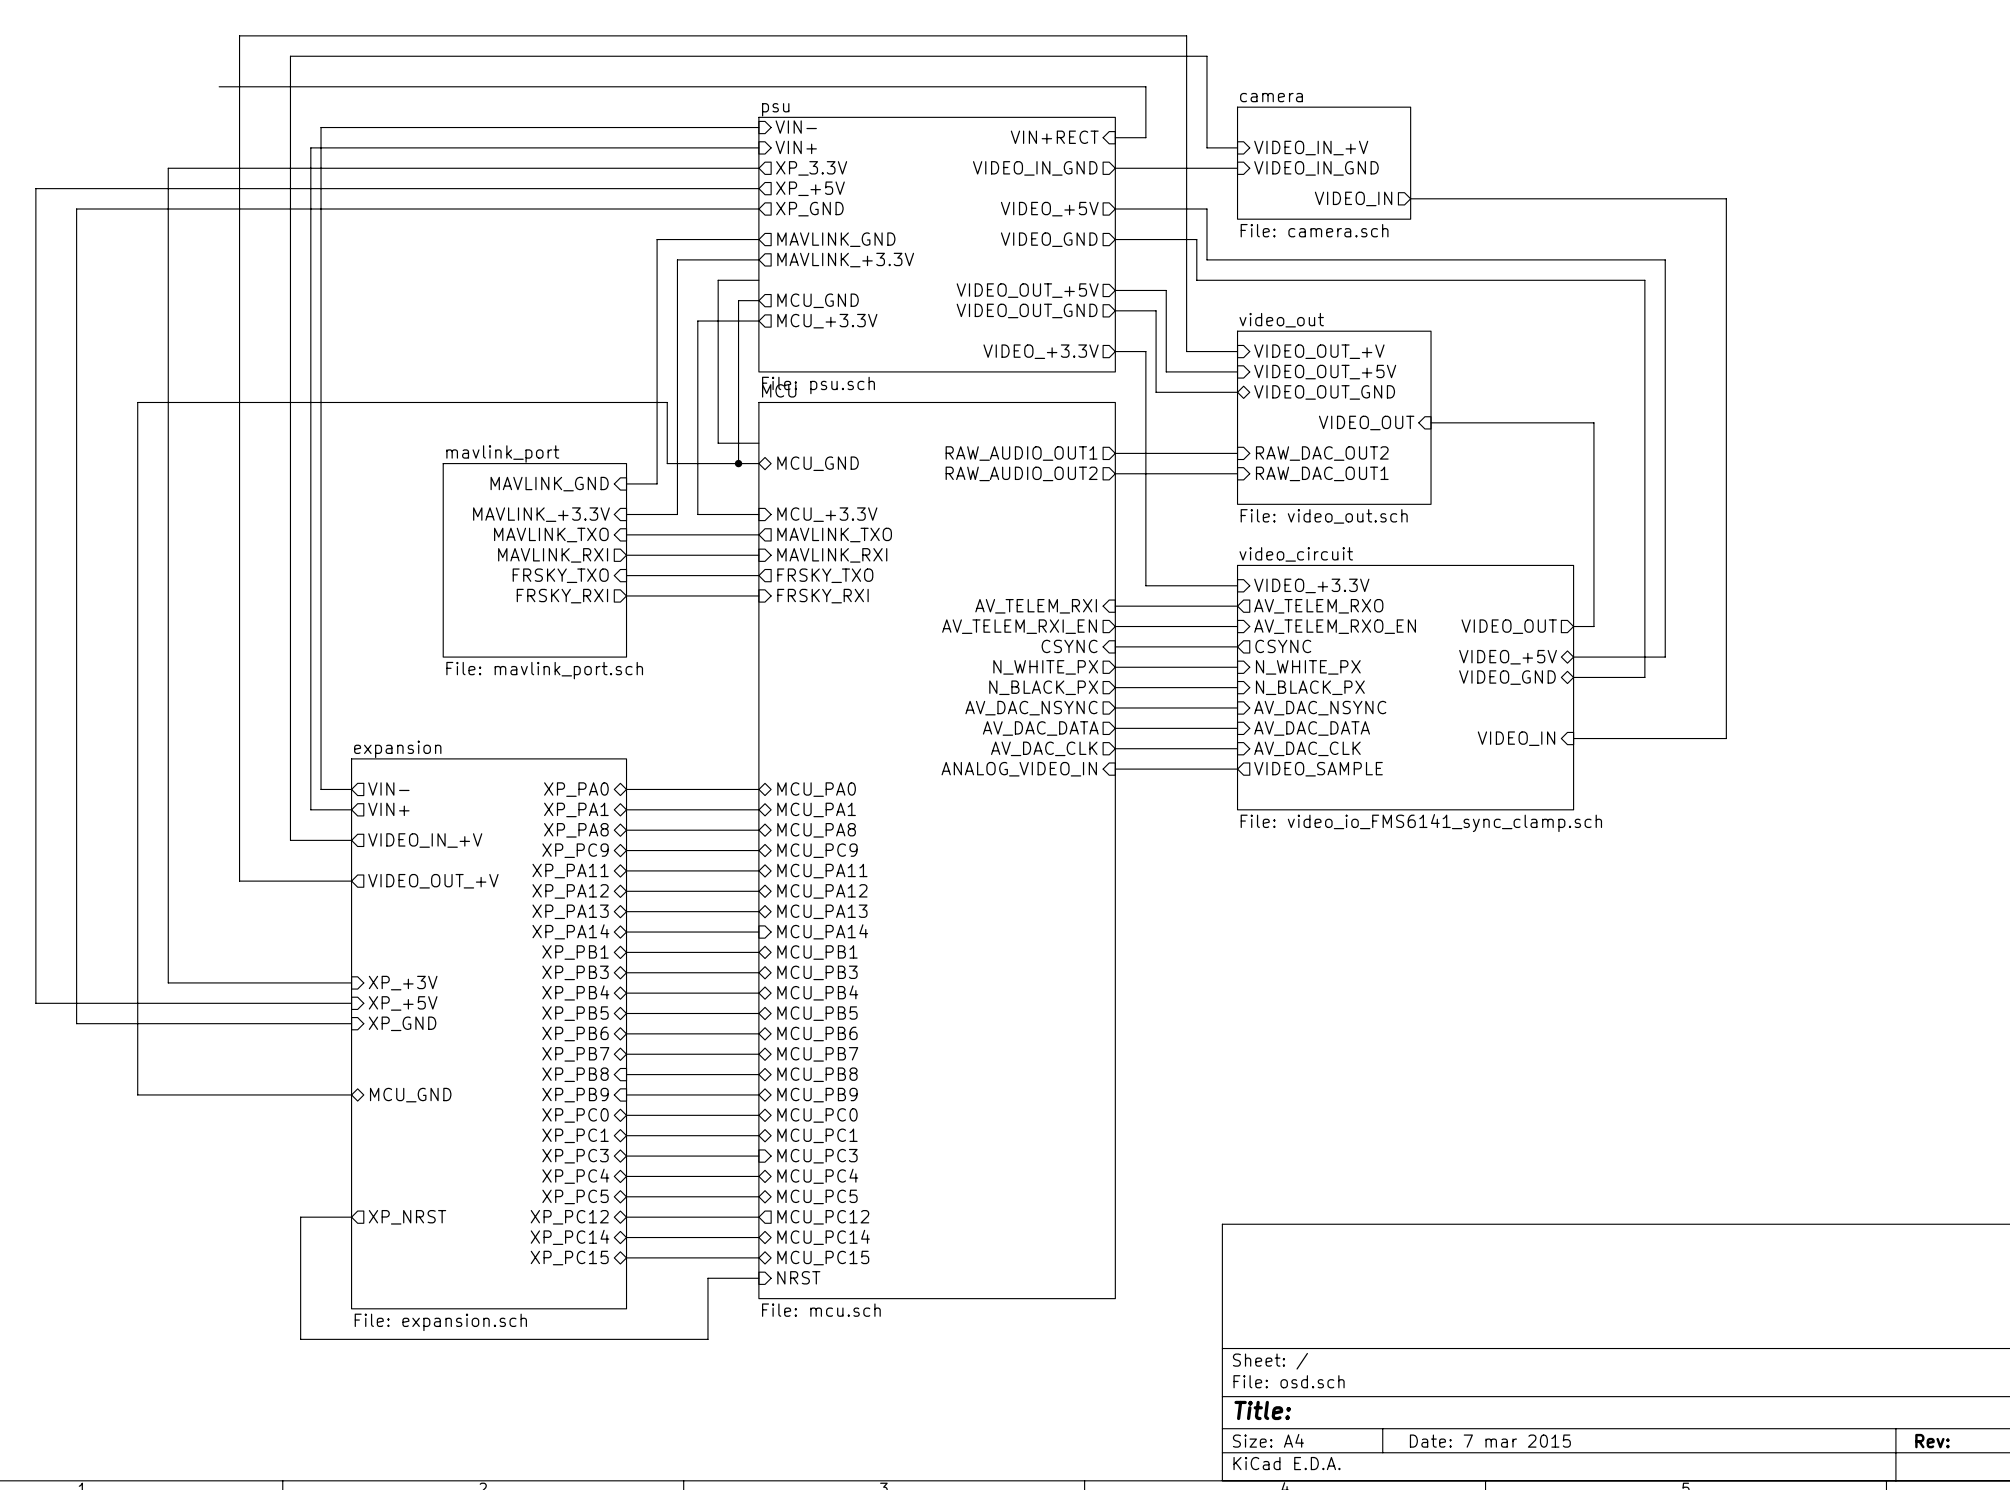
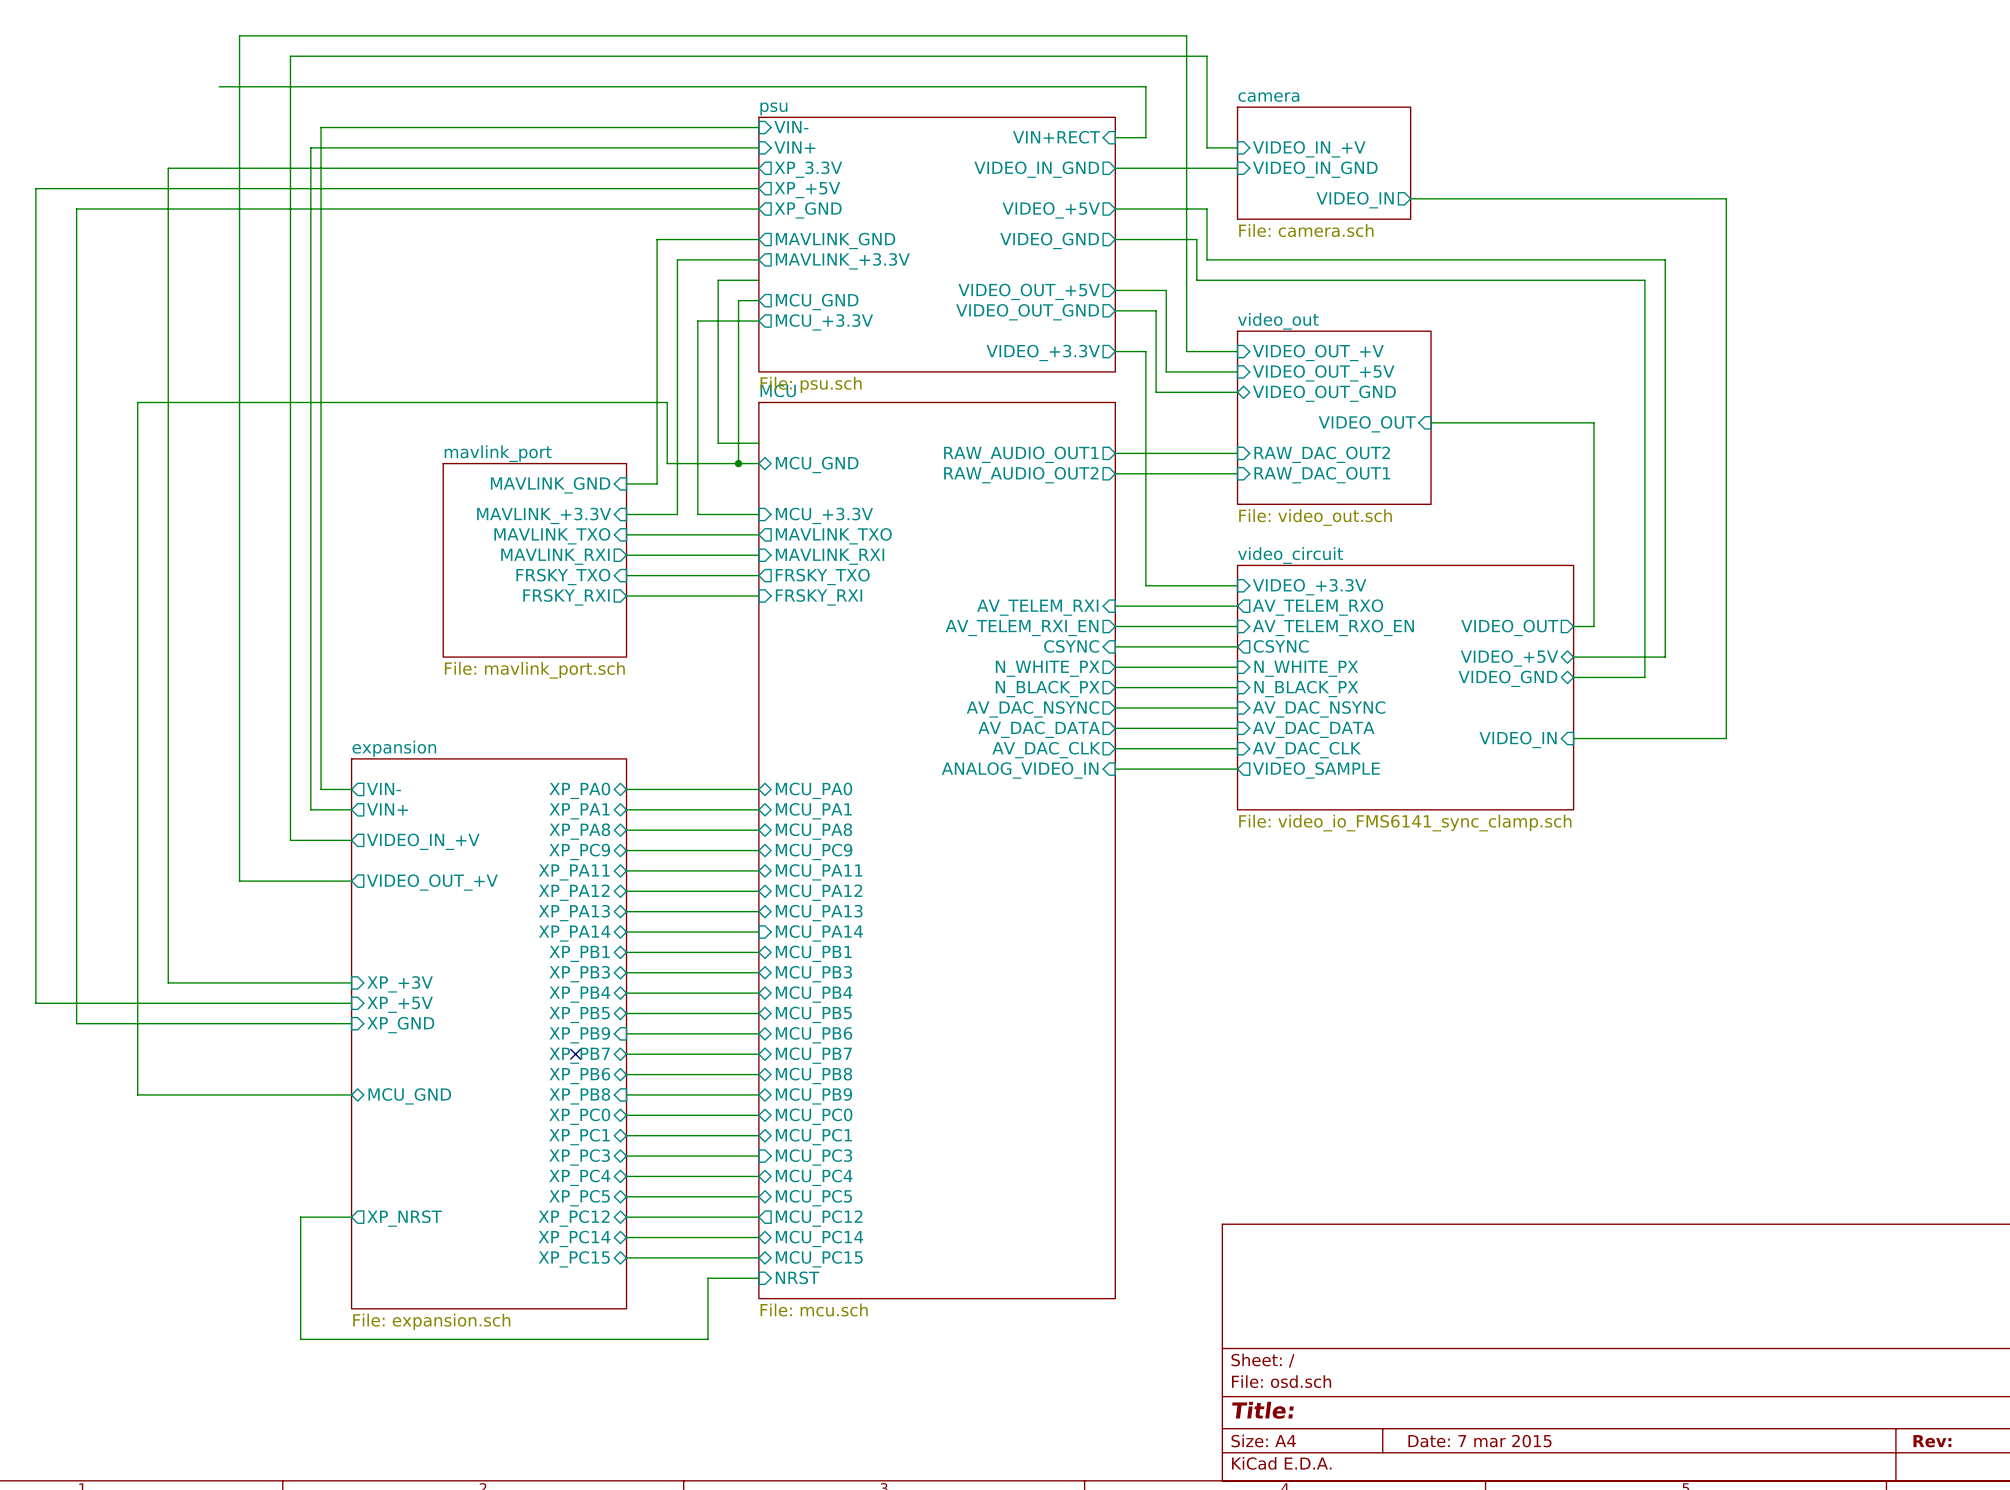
sheet pin shape: bidirectional (575, 1033) -> input (579, 1035)
sheet pin: XP_PB6 (575, 1033) -> XP_PB9 (579, 1035)
no-connect mark: none -> (575, 1054)
sheet pin shape: input (575, 1074) -> bidirectional (579, 1076)
sheet pin: XP_PB8 (575, 1074) -> XP_PB6 (579, 1076)
sheet pin: XP_PB9 (575, 1095) -> XP_PB8 (579, 1096)

